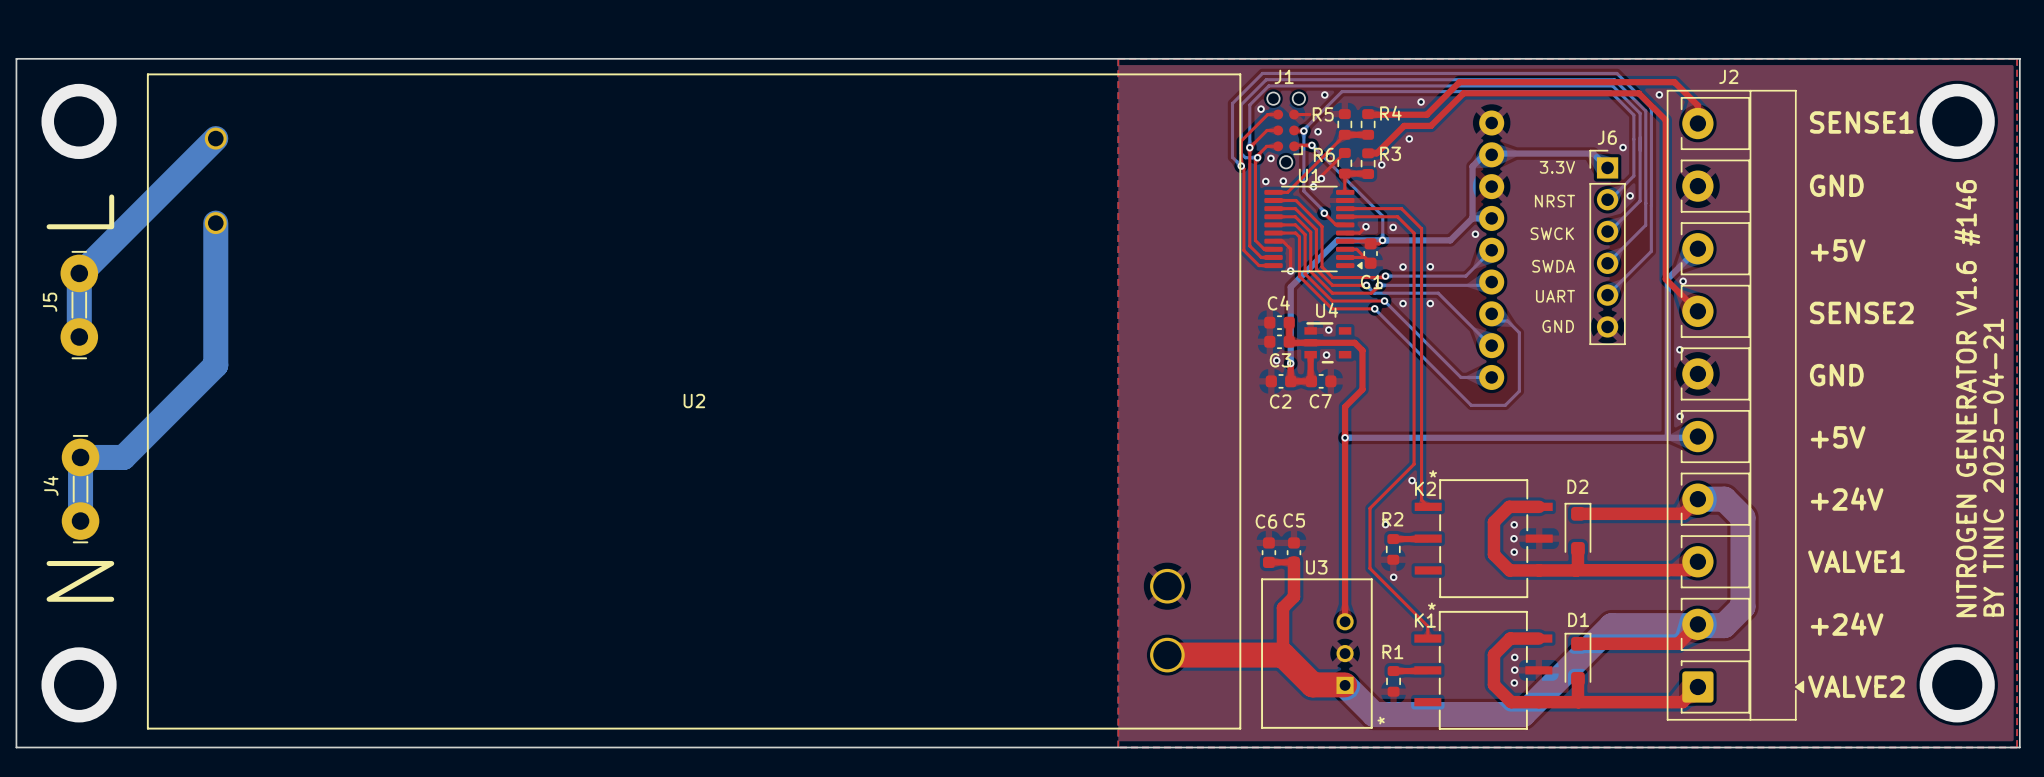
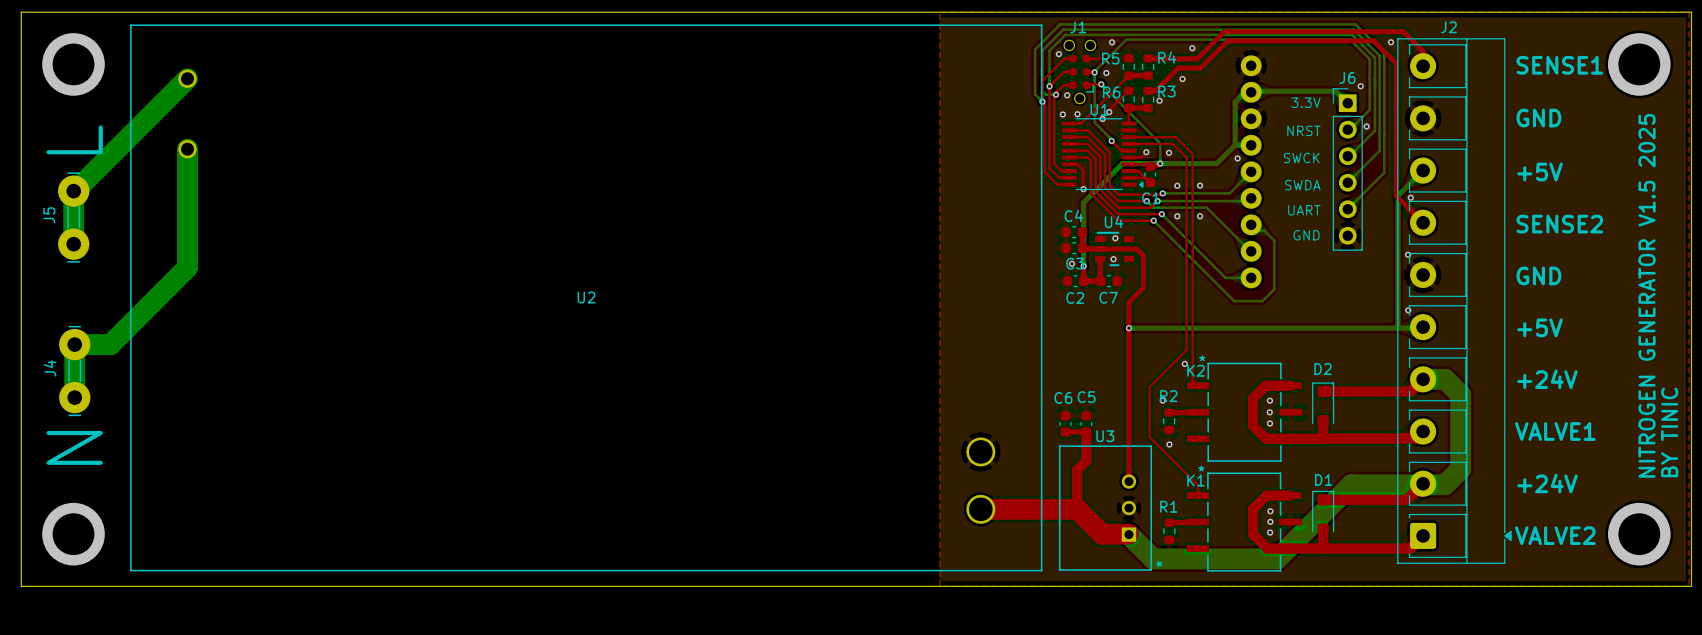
text: NITROGEN GENERATOR V1.6 #146 (1967, 398) -> NITROGEN GENERATOR V1.5 2025 (1647, 295)
text: BY TINIC 2025-04-21 (1993, 467) -> BY TINIC (1669, 432)

